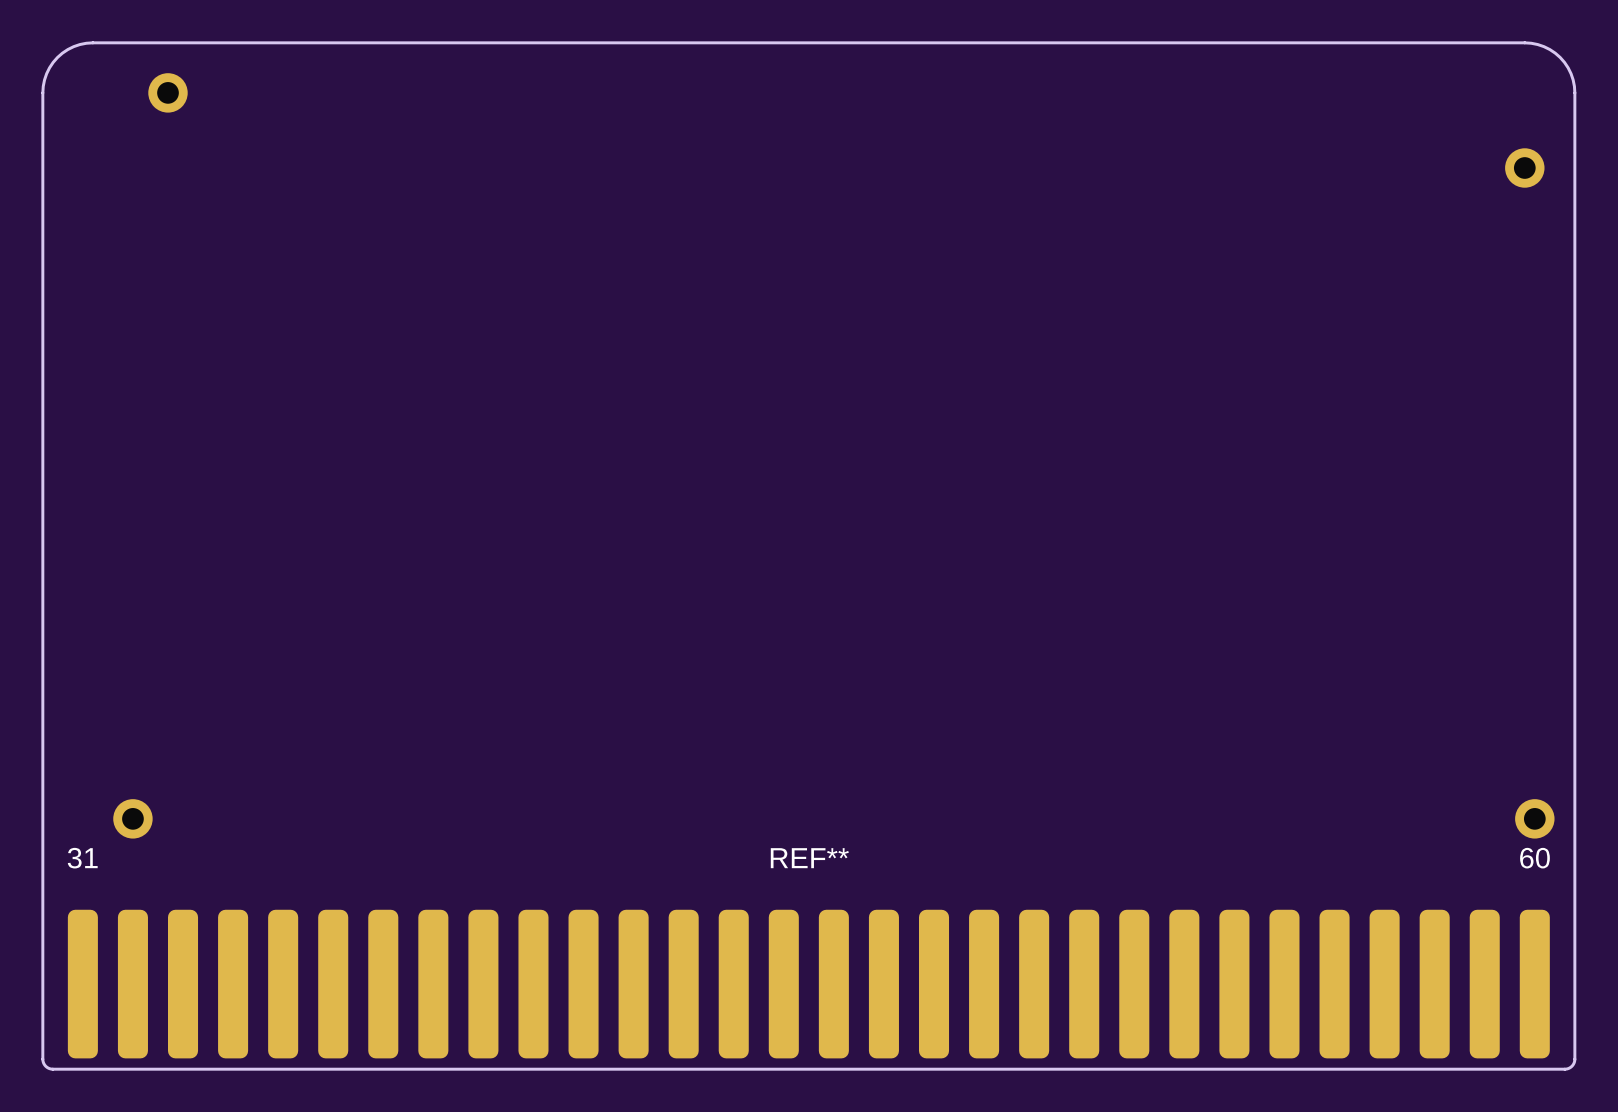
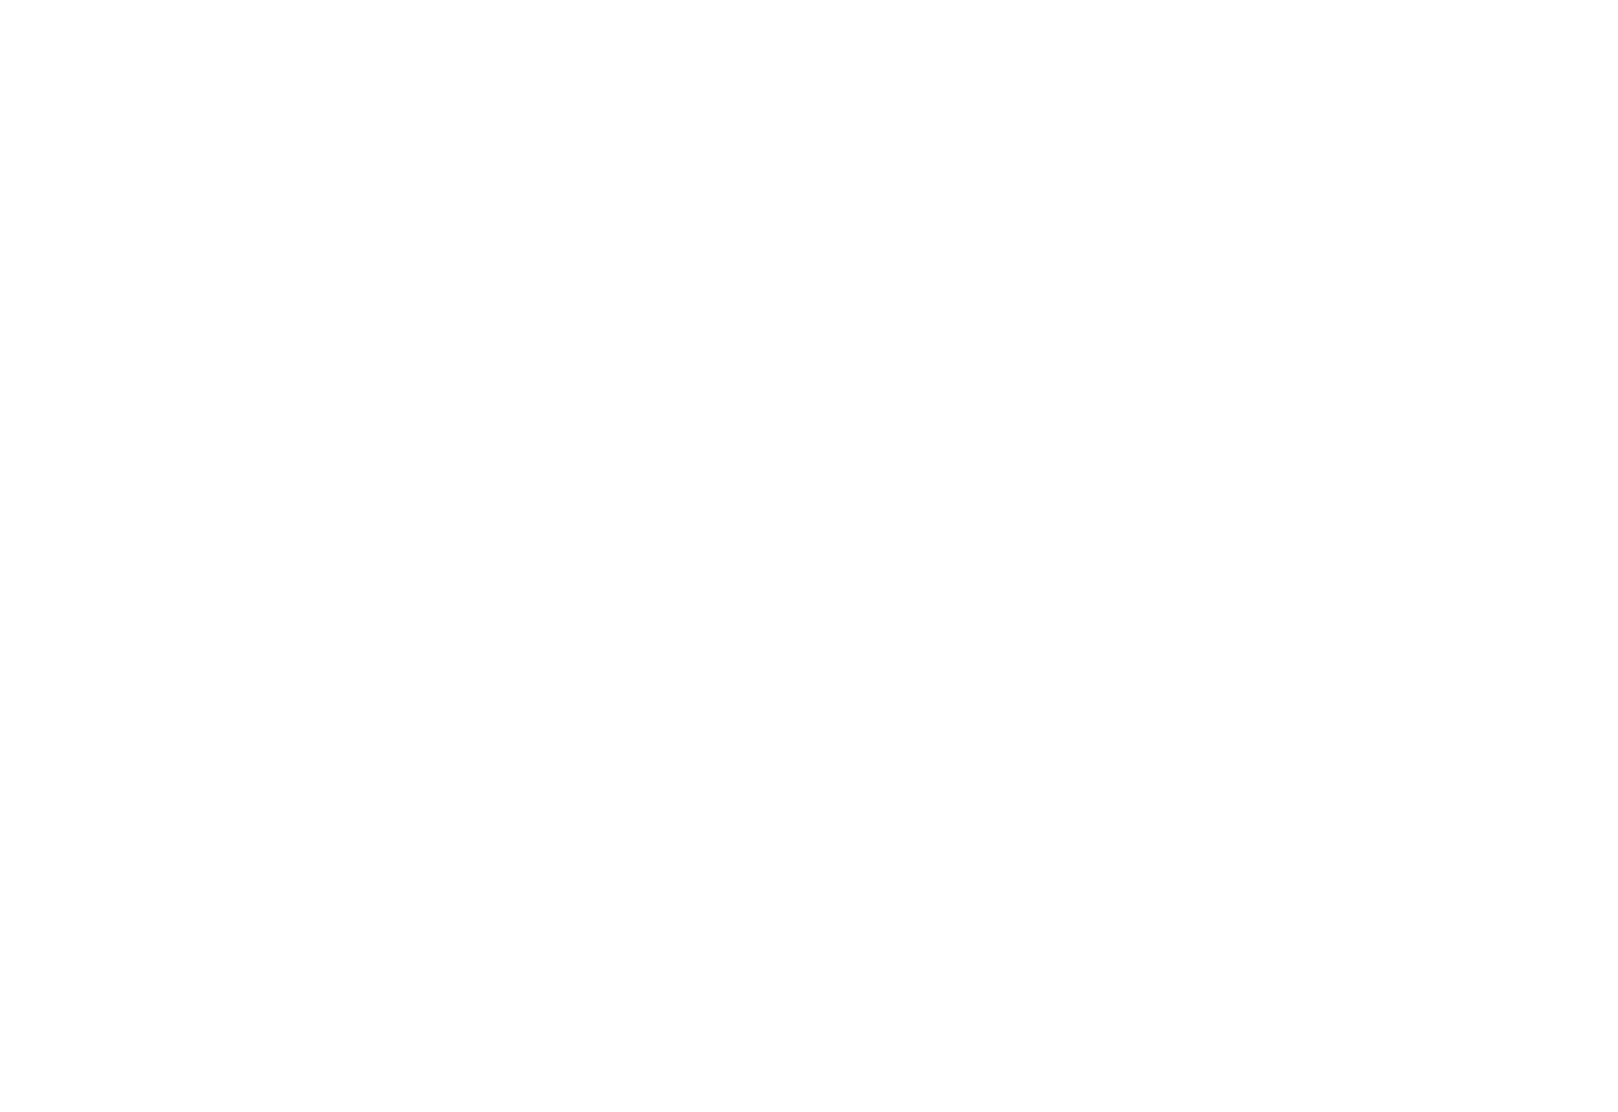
board edge: (1524, 42) (92, 42) (73, 46) (62, 53) (49, 67) (44, 79) (42, 92) (42, 1059) (44, 1065) (52, 1069) (1564, 1069) (1570, 1067) (1574, 1059) (1574, 92) (1571, 73) (1560, 57) (1543, 46) (1524, 42) -> none
part: (167, 92) -> none
part: (1524, 167) -> none
part: (132, 818) -> none
part: (1534, 818) -> none
part: (808, 984) -> none

